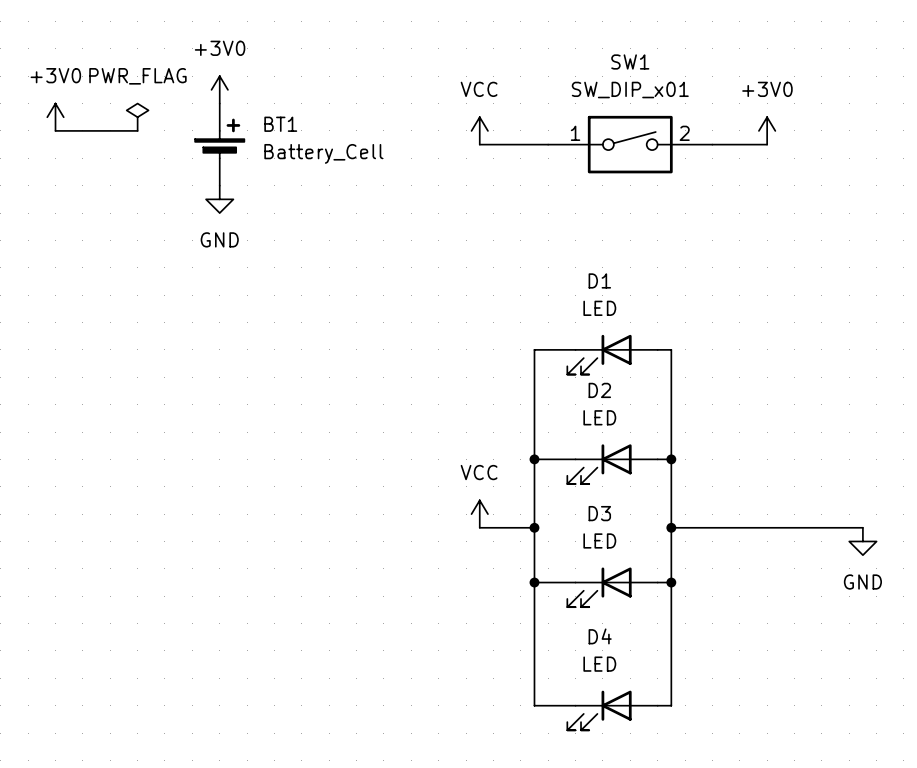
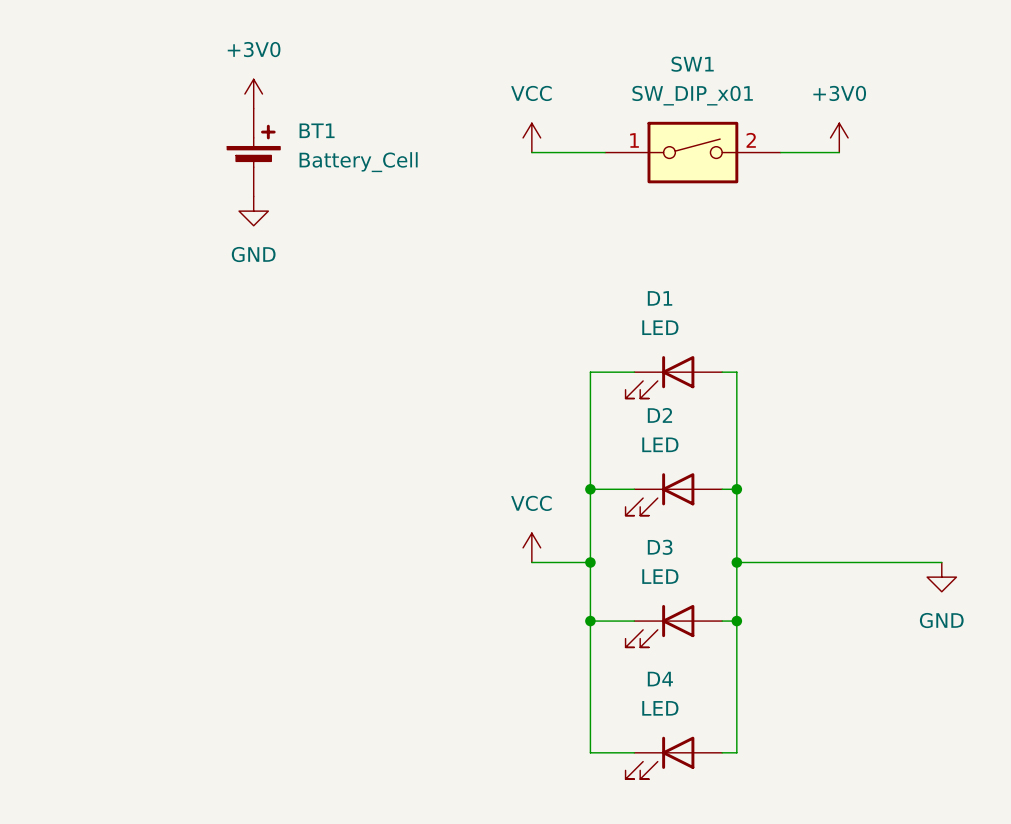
power symbol: +3V0 (55, 117) -> none
power symbol: PWR_FLAG (137, 117) -> none
wire: (55, 130) (137, 130) -> none

